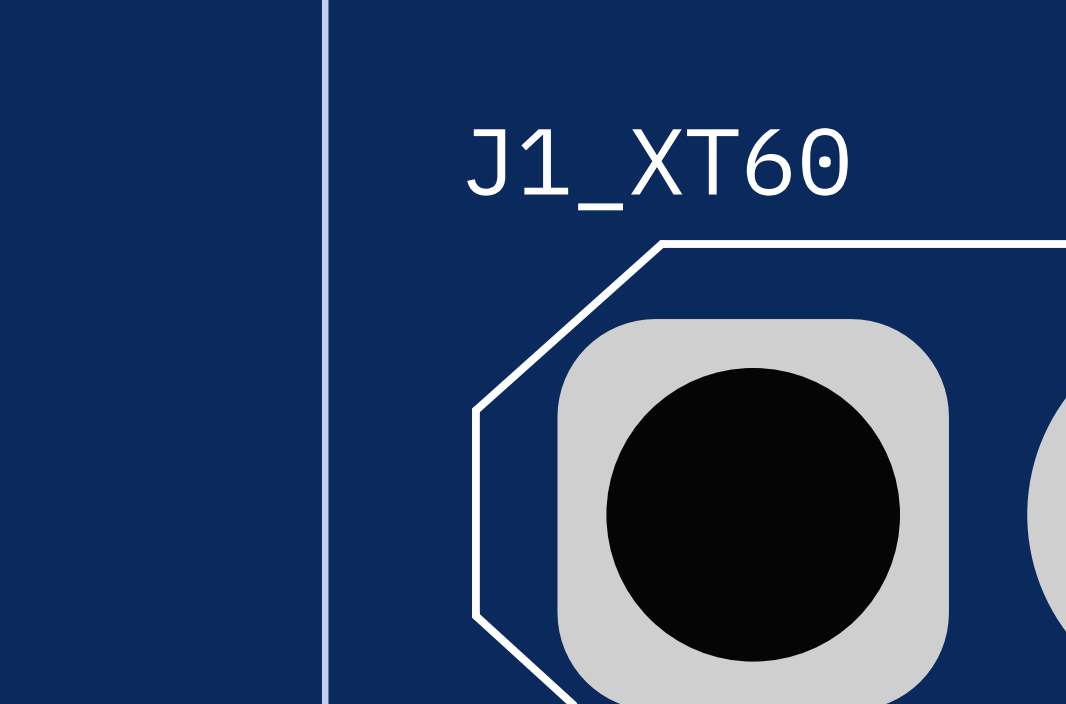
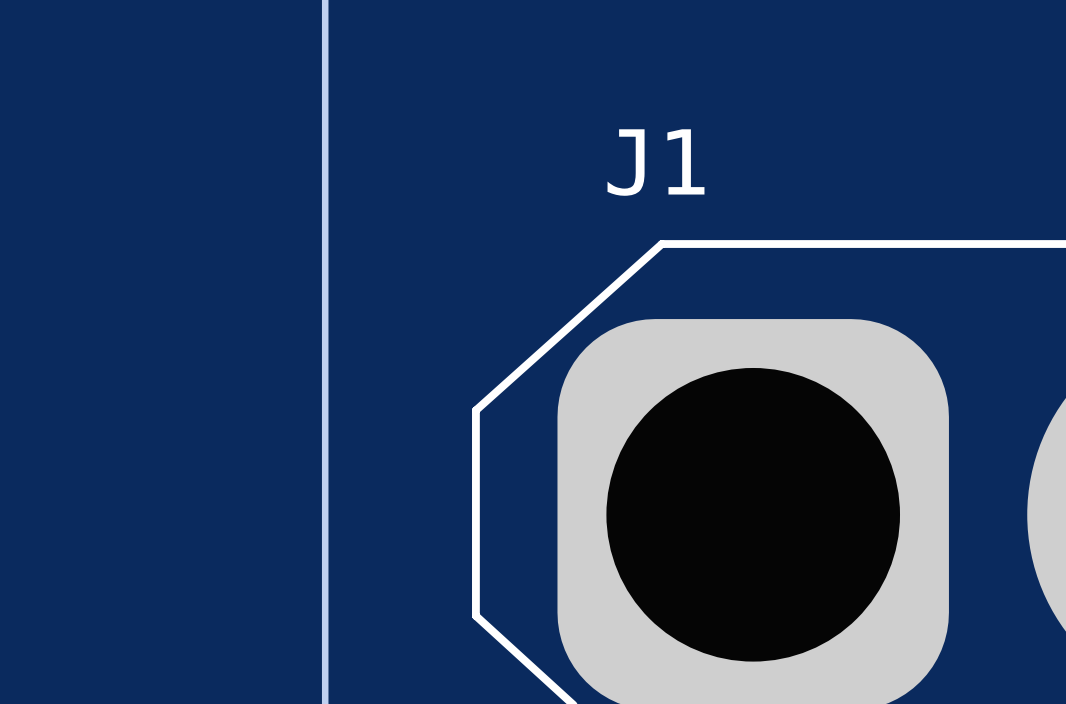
J1_XT60 name: J1_XT60 (657, 169) -> J1 (656, 162)

